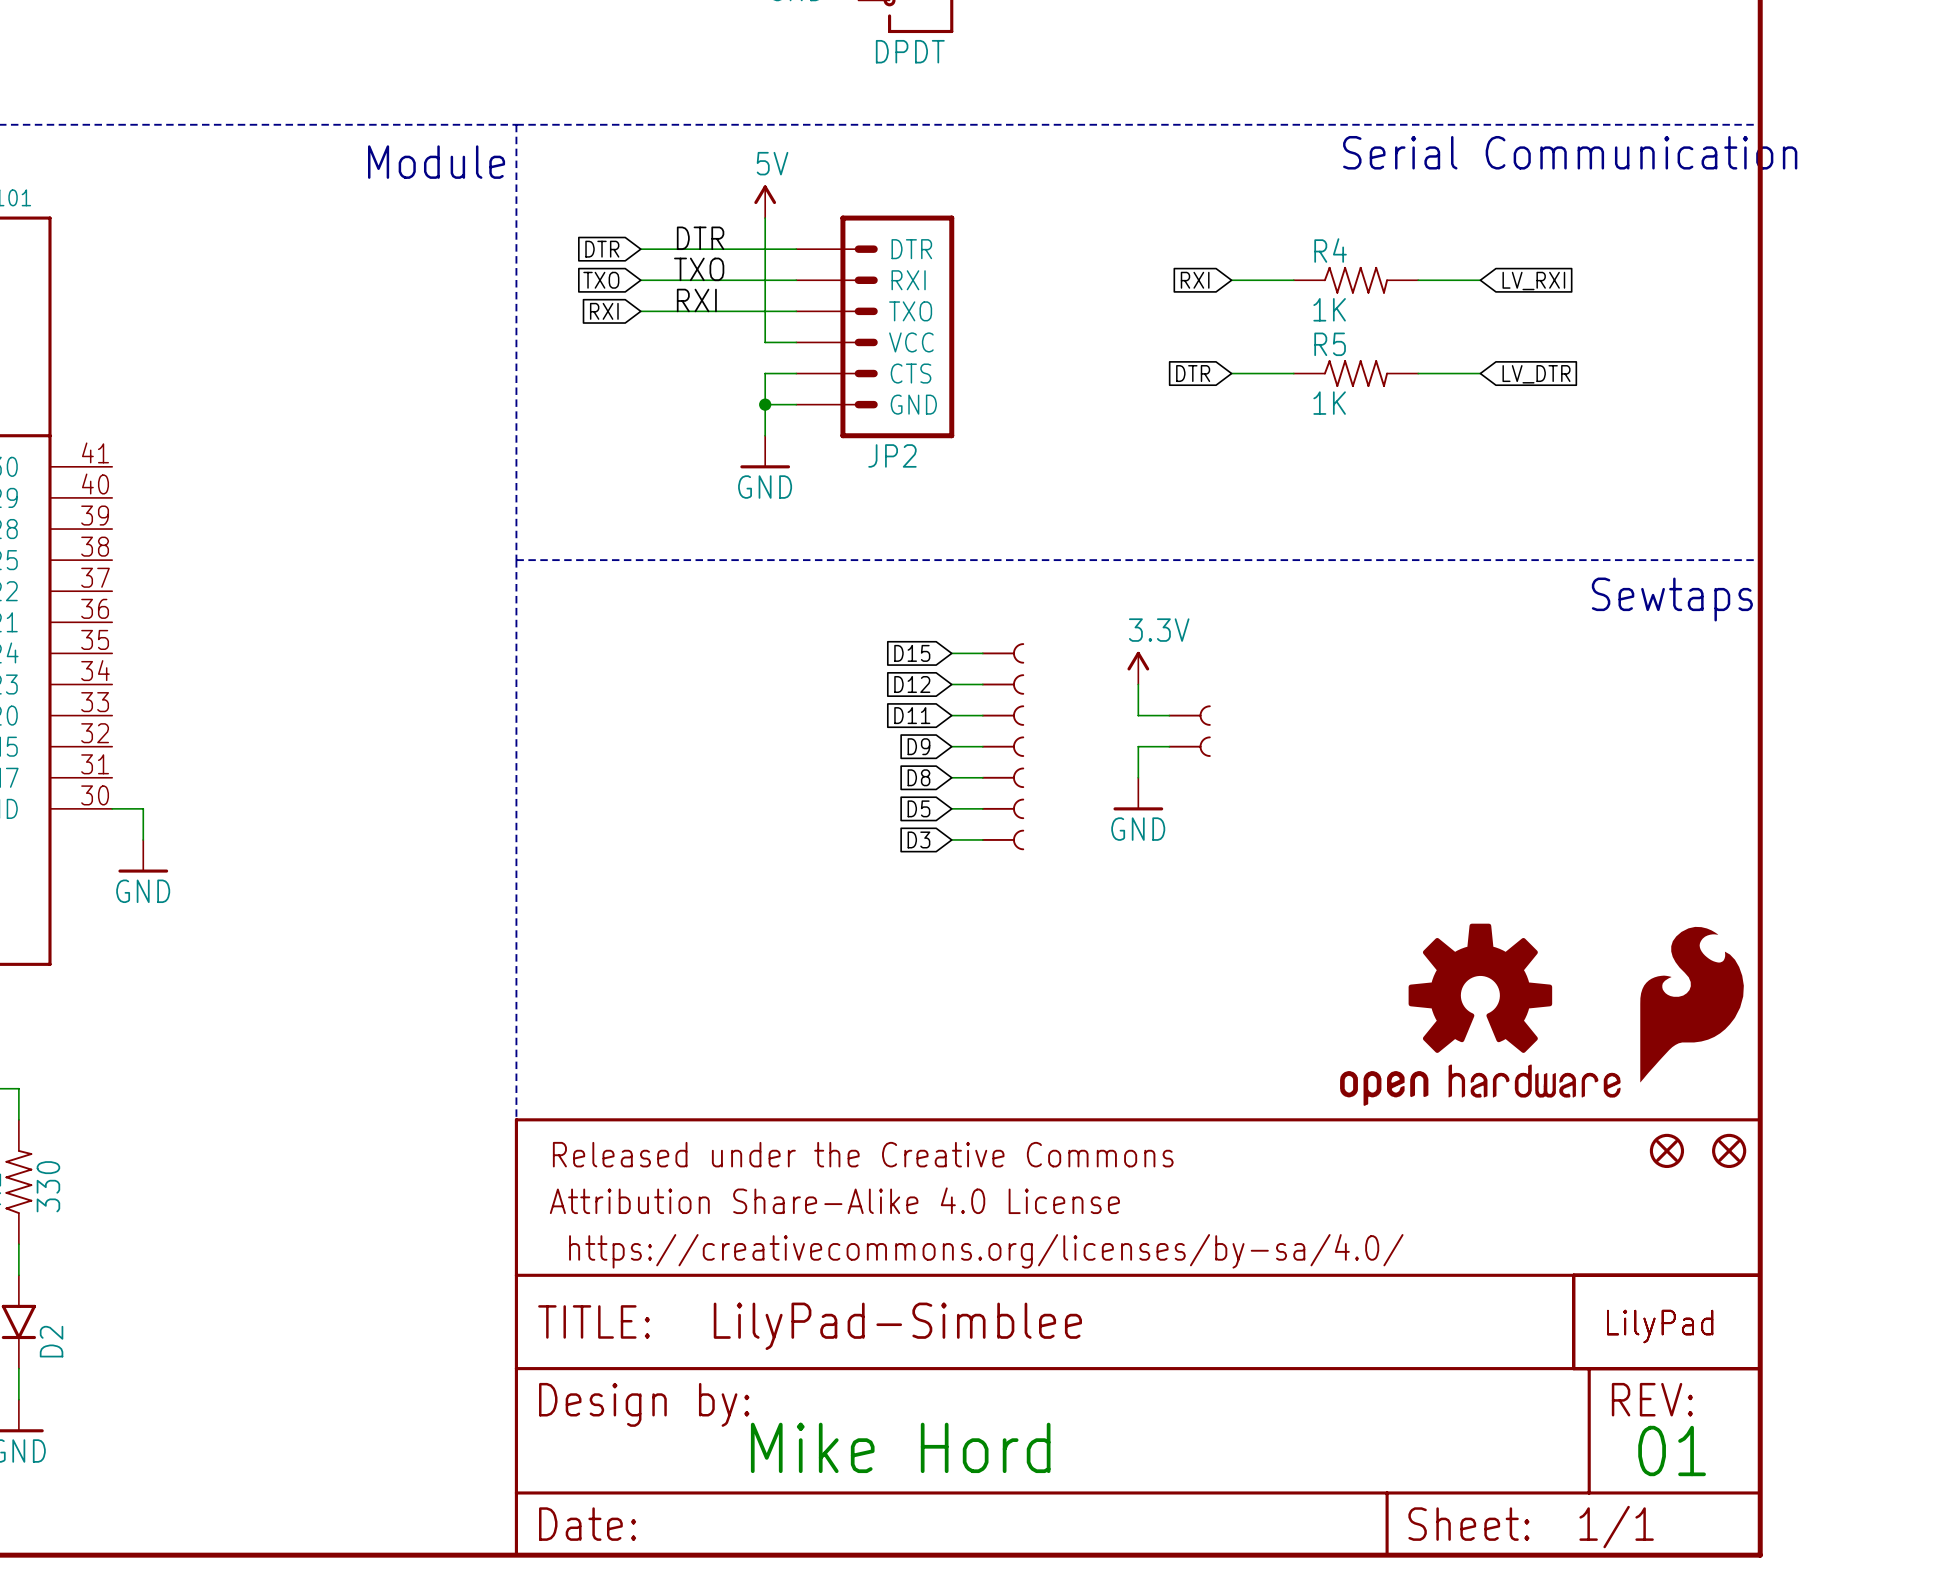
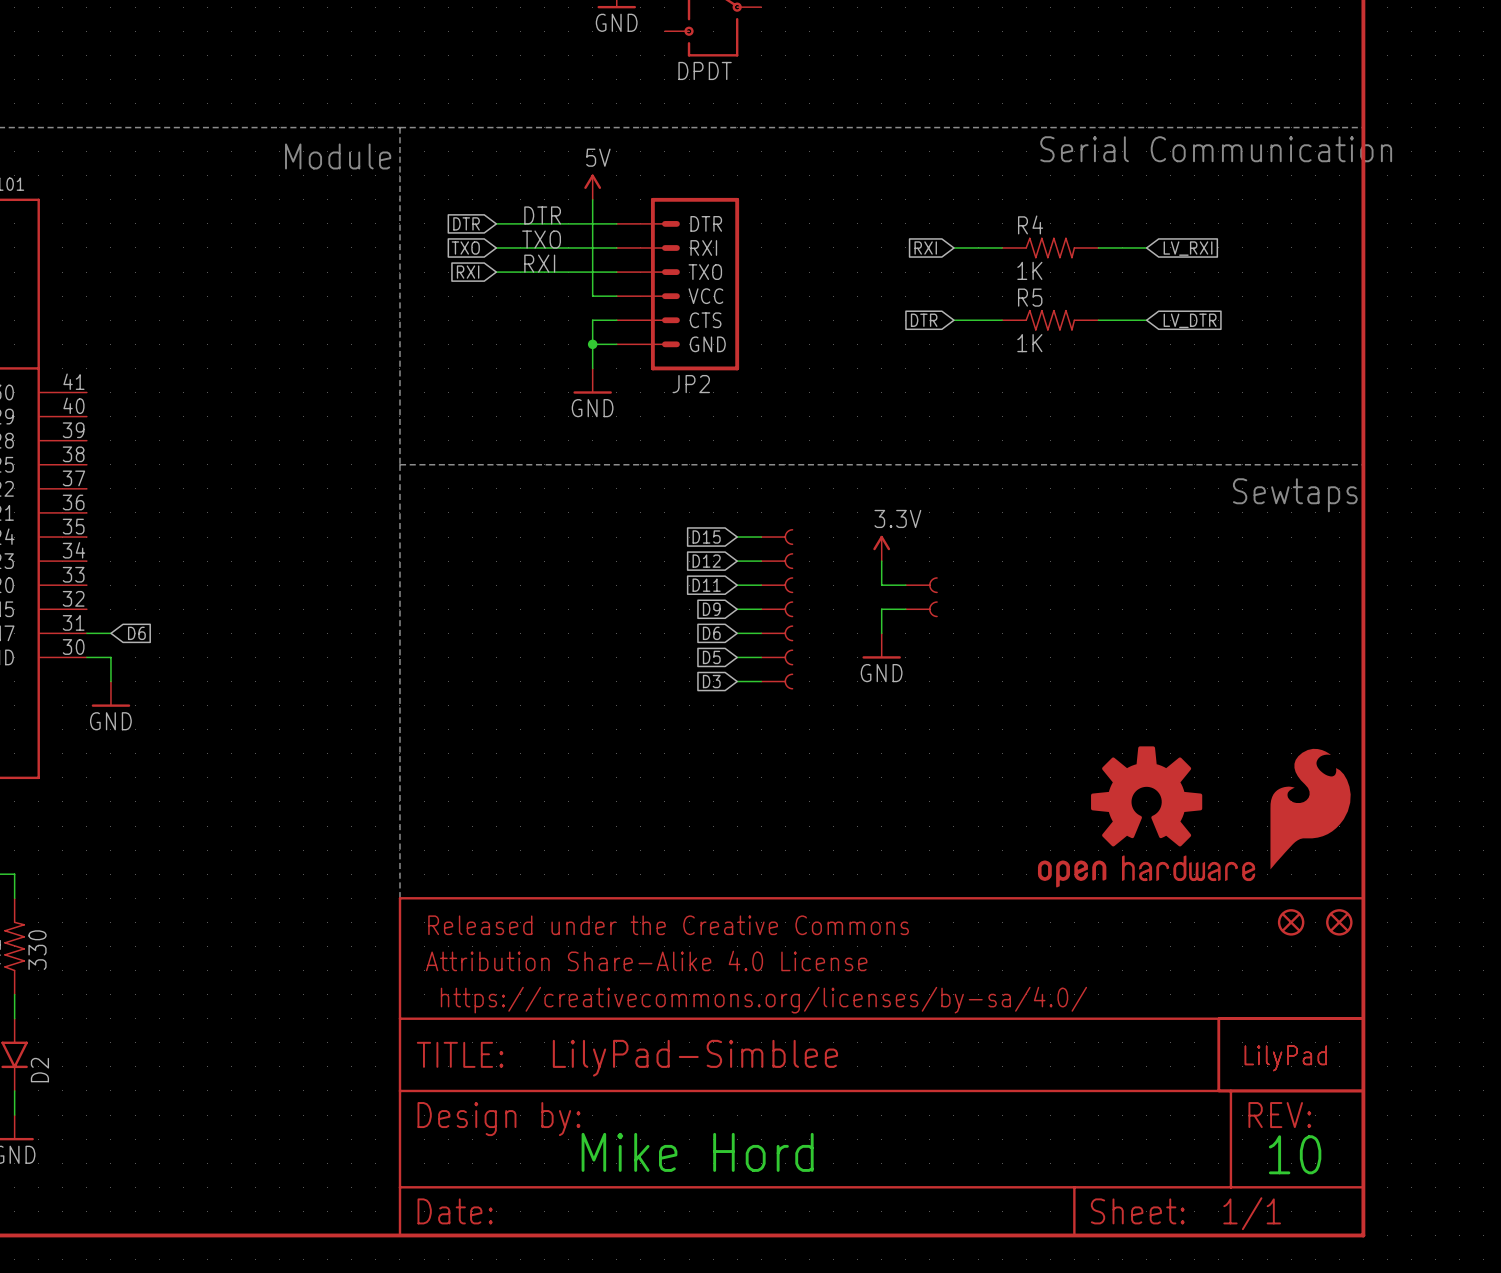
wire: none -> (86, 633) (110, 633)
global label: none -> D6 (136, 633)
global label: D8 (918, 777) -> D6 (711, 633)
text: 01 (1672, 1451) -> 10 (1295, 1154)

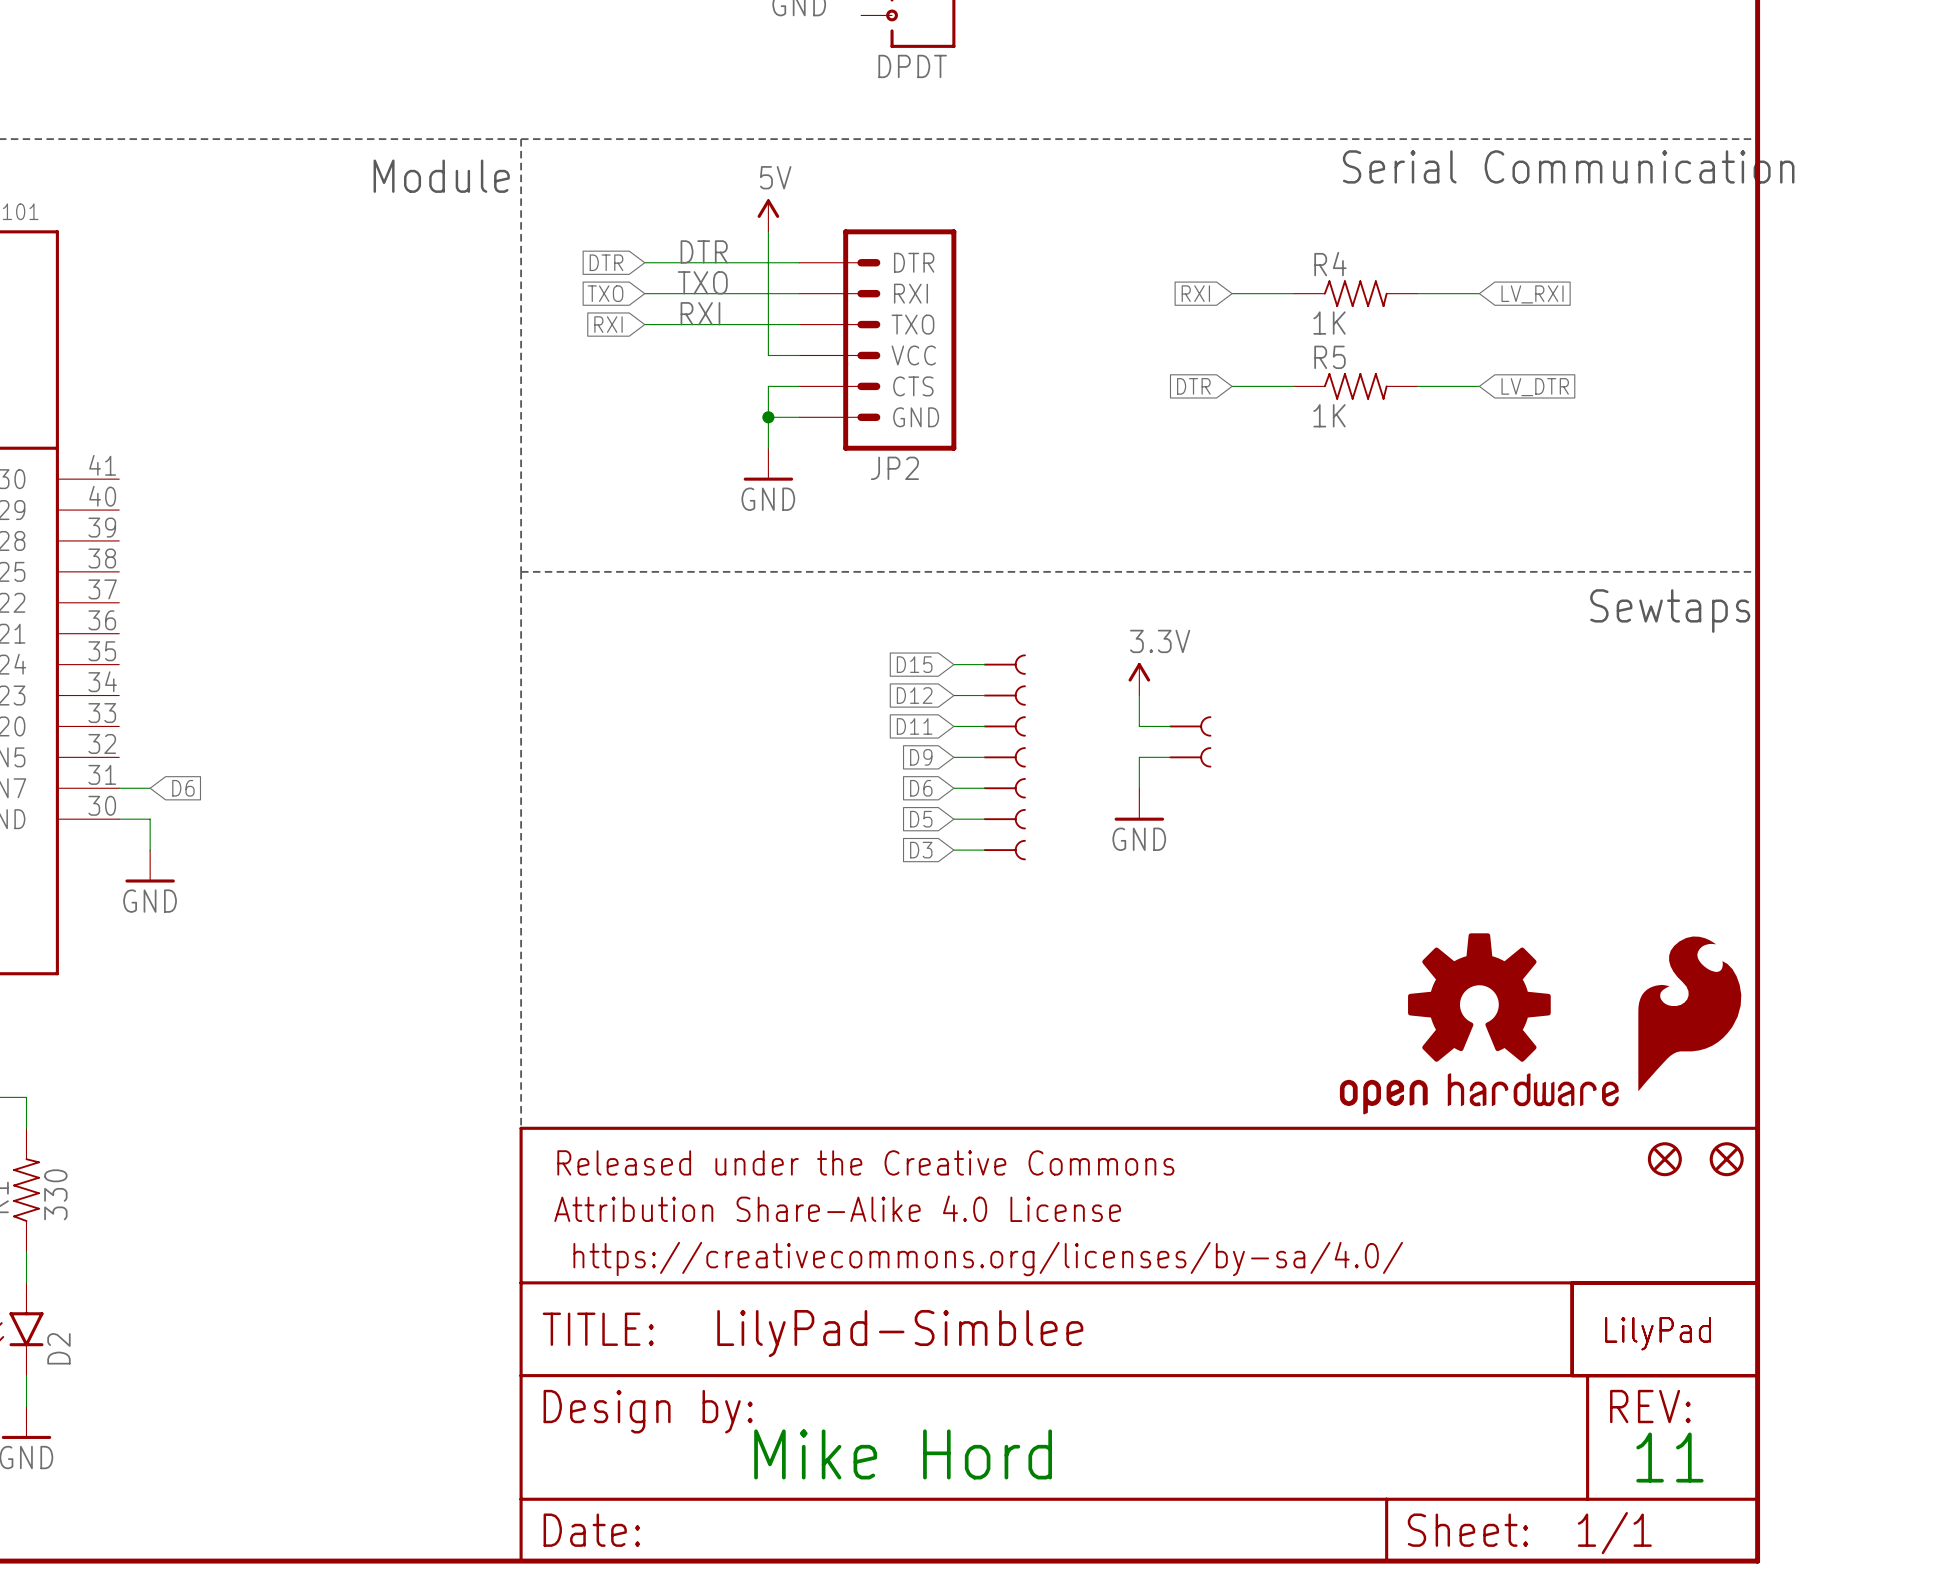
text: 10 (1295, 1154) -> 11 (1669, 1457)

